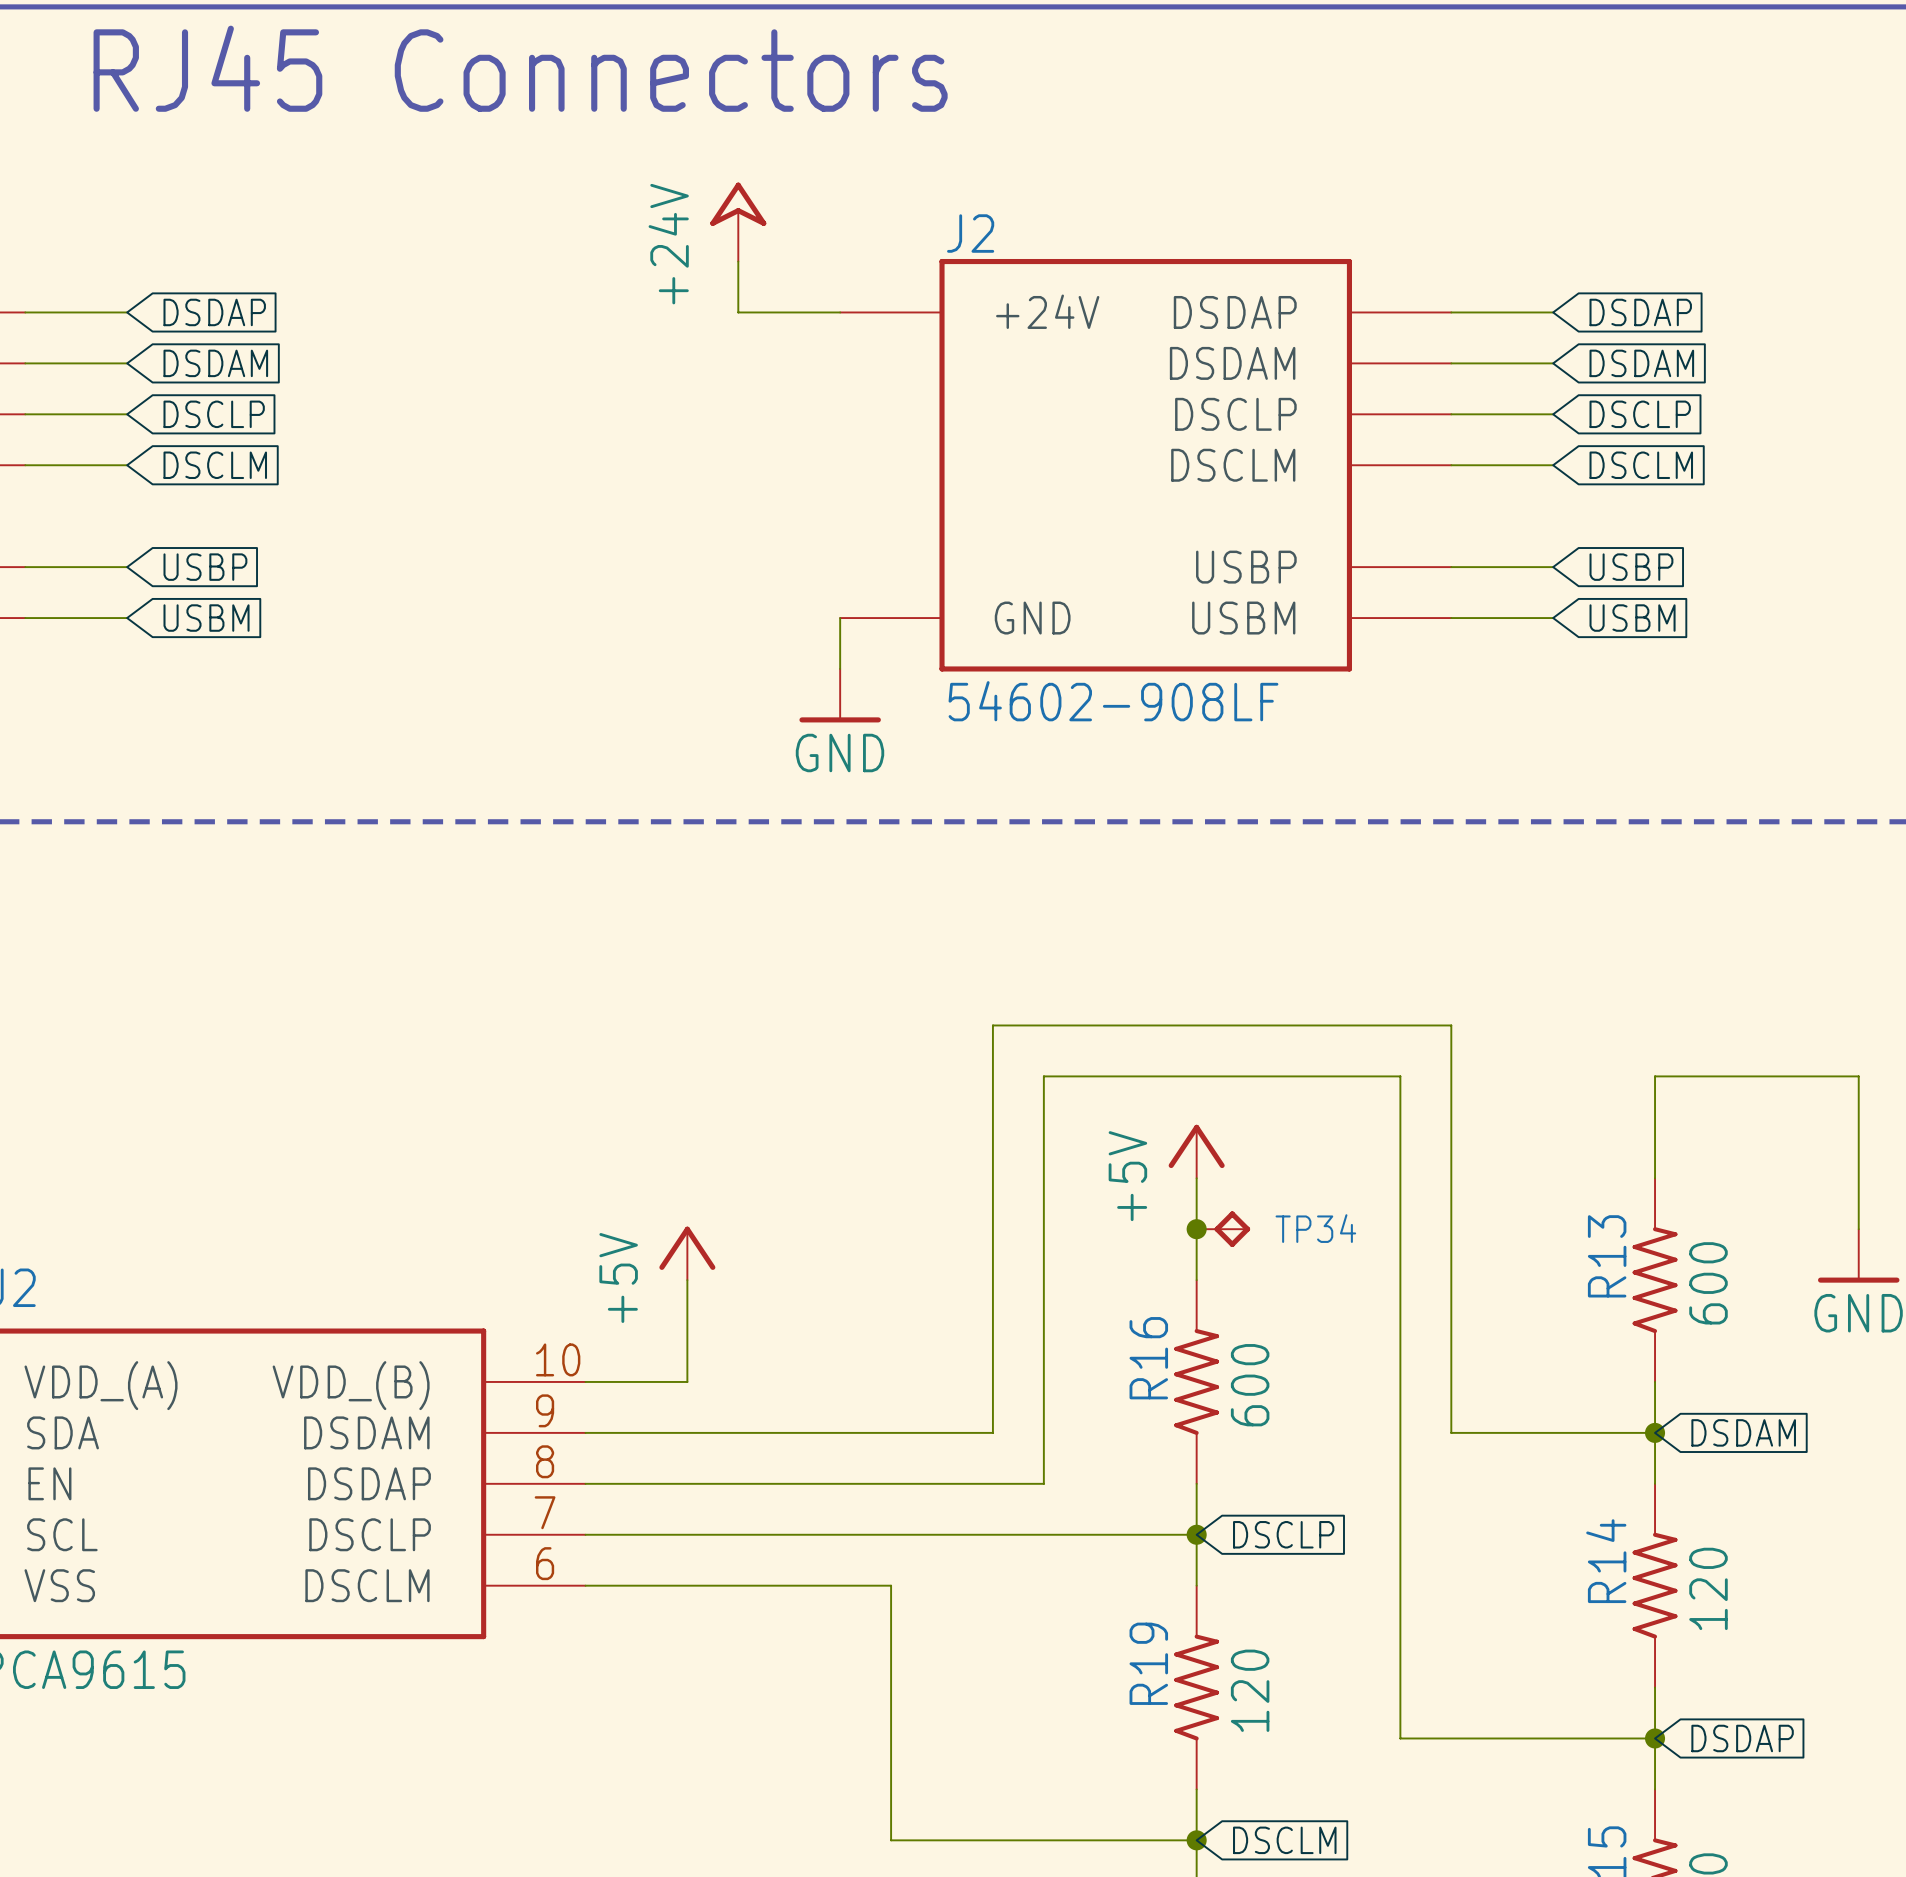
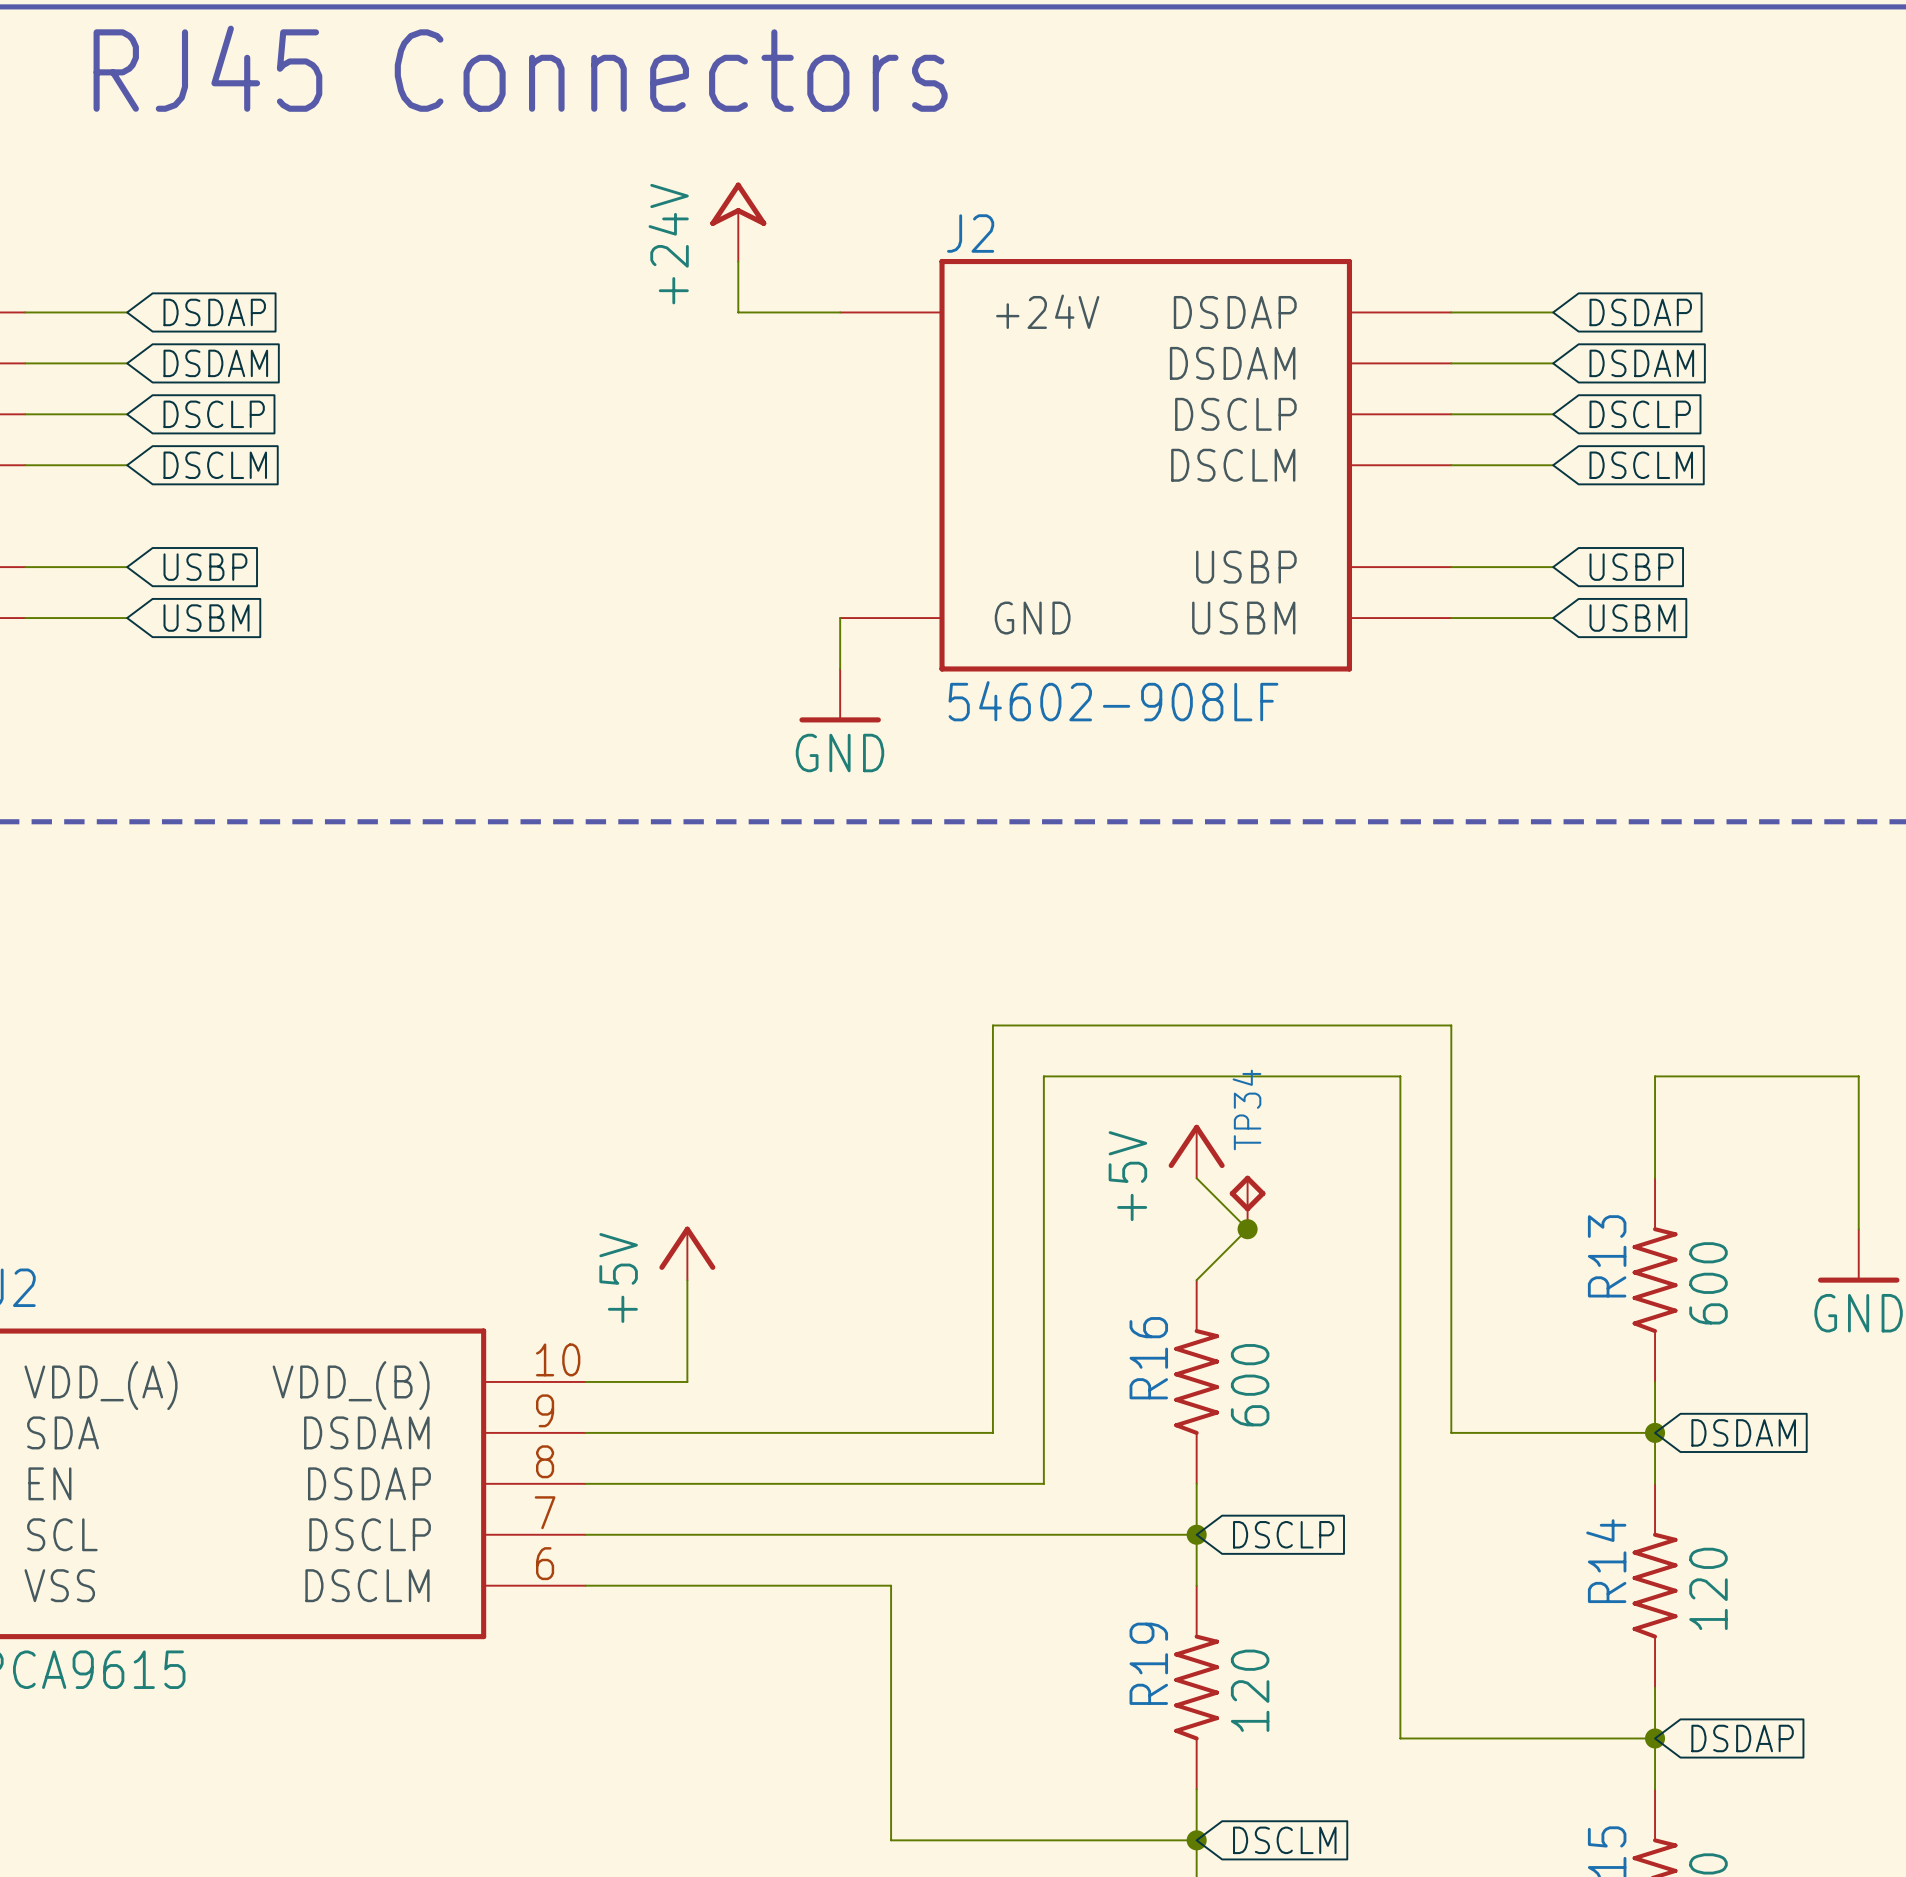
wire: (1196, 1178) (1196, 1280) -> (1196, 1178) (1247, 1229) (1196, 1280)
junction position: (1196, 1229) -> (1247, 1229)
TP34 position: (1223, 1229) -> (1247, 1202)
TP34 rotation: 0° (1232, 1229) -> 90° counterclockwise (1247, 1193)

